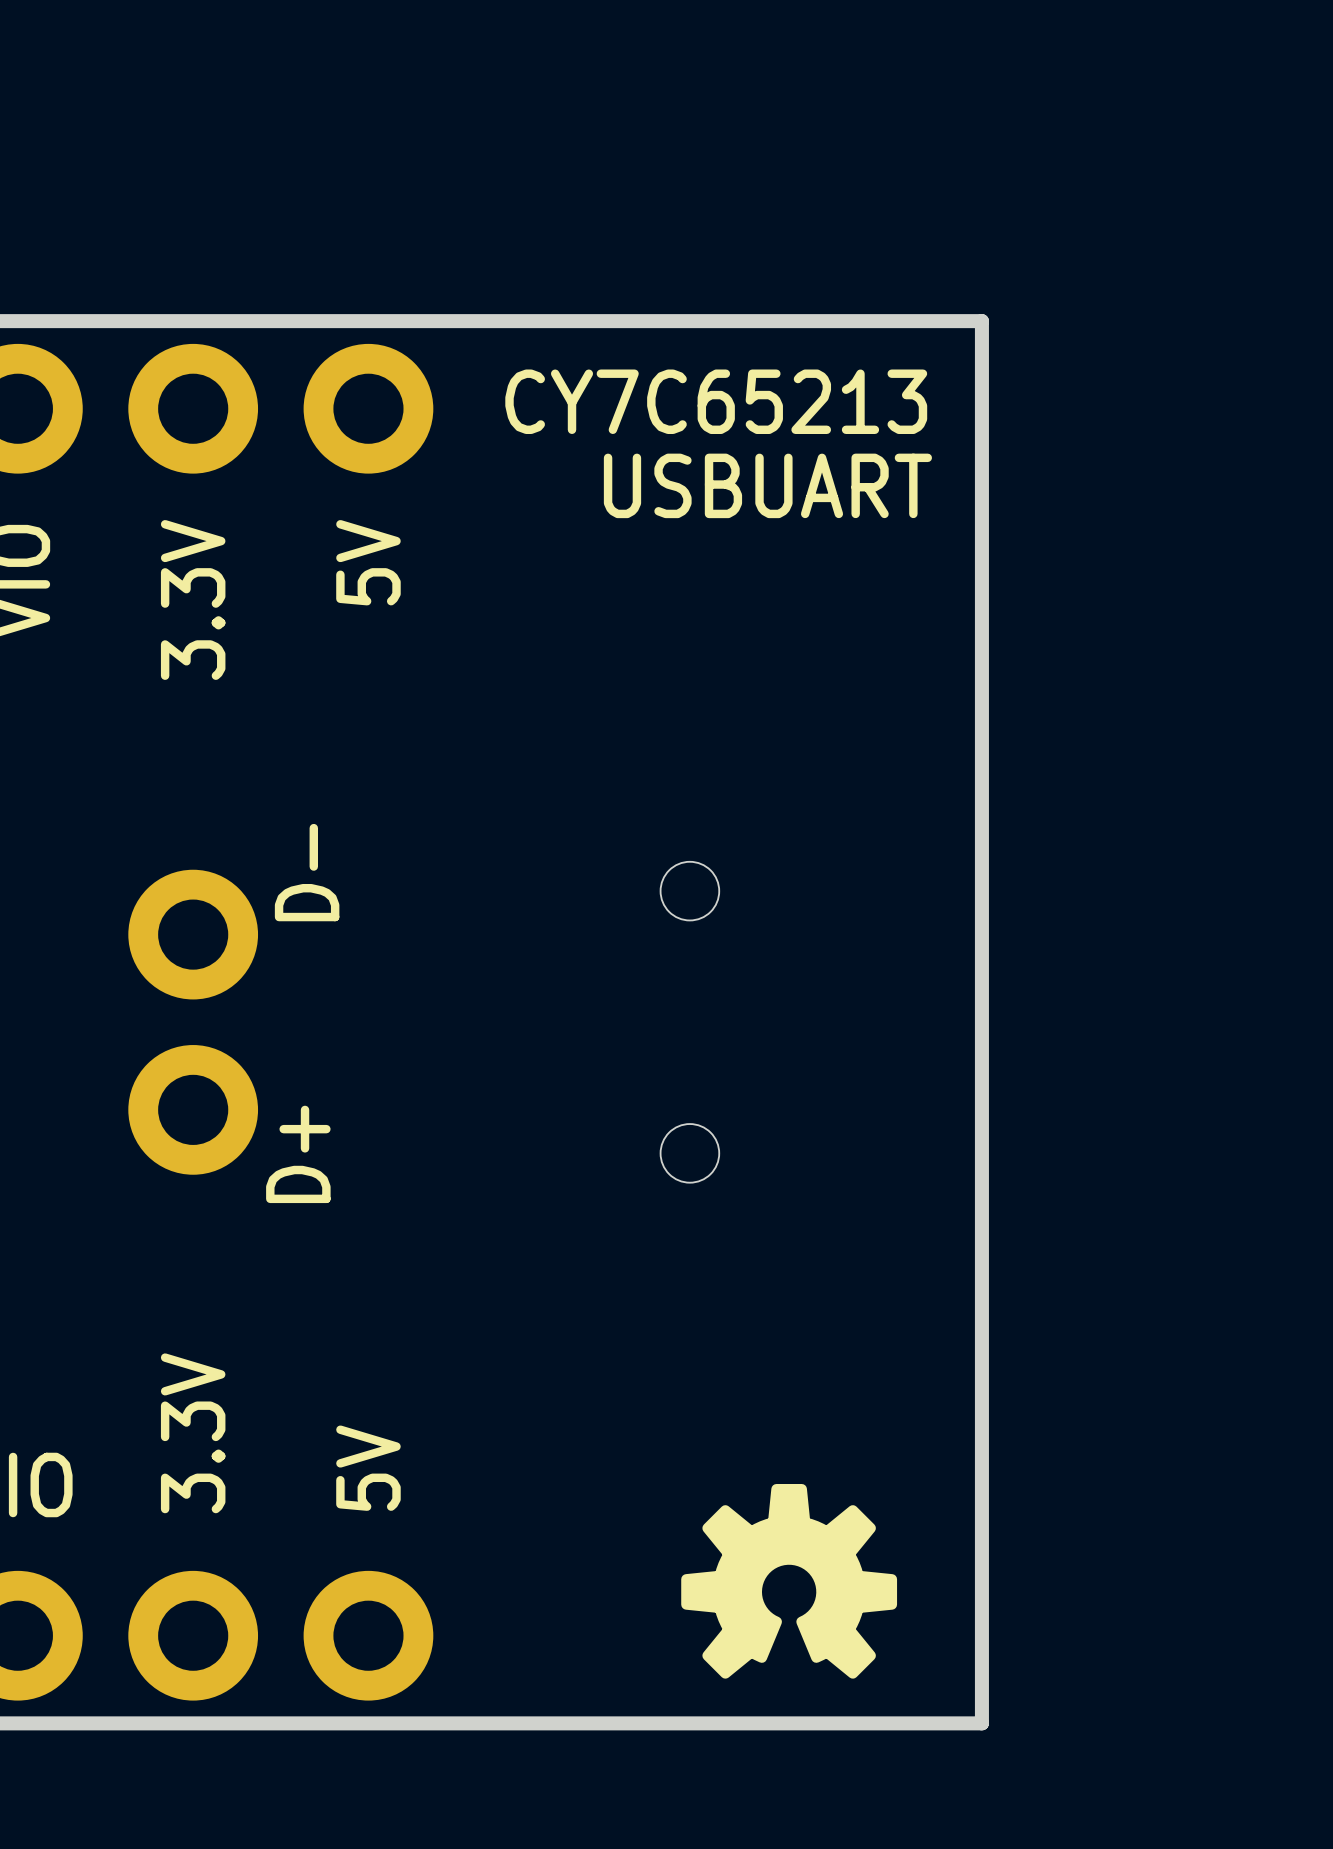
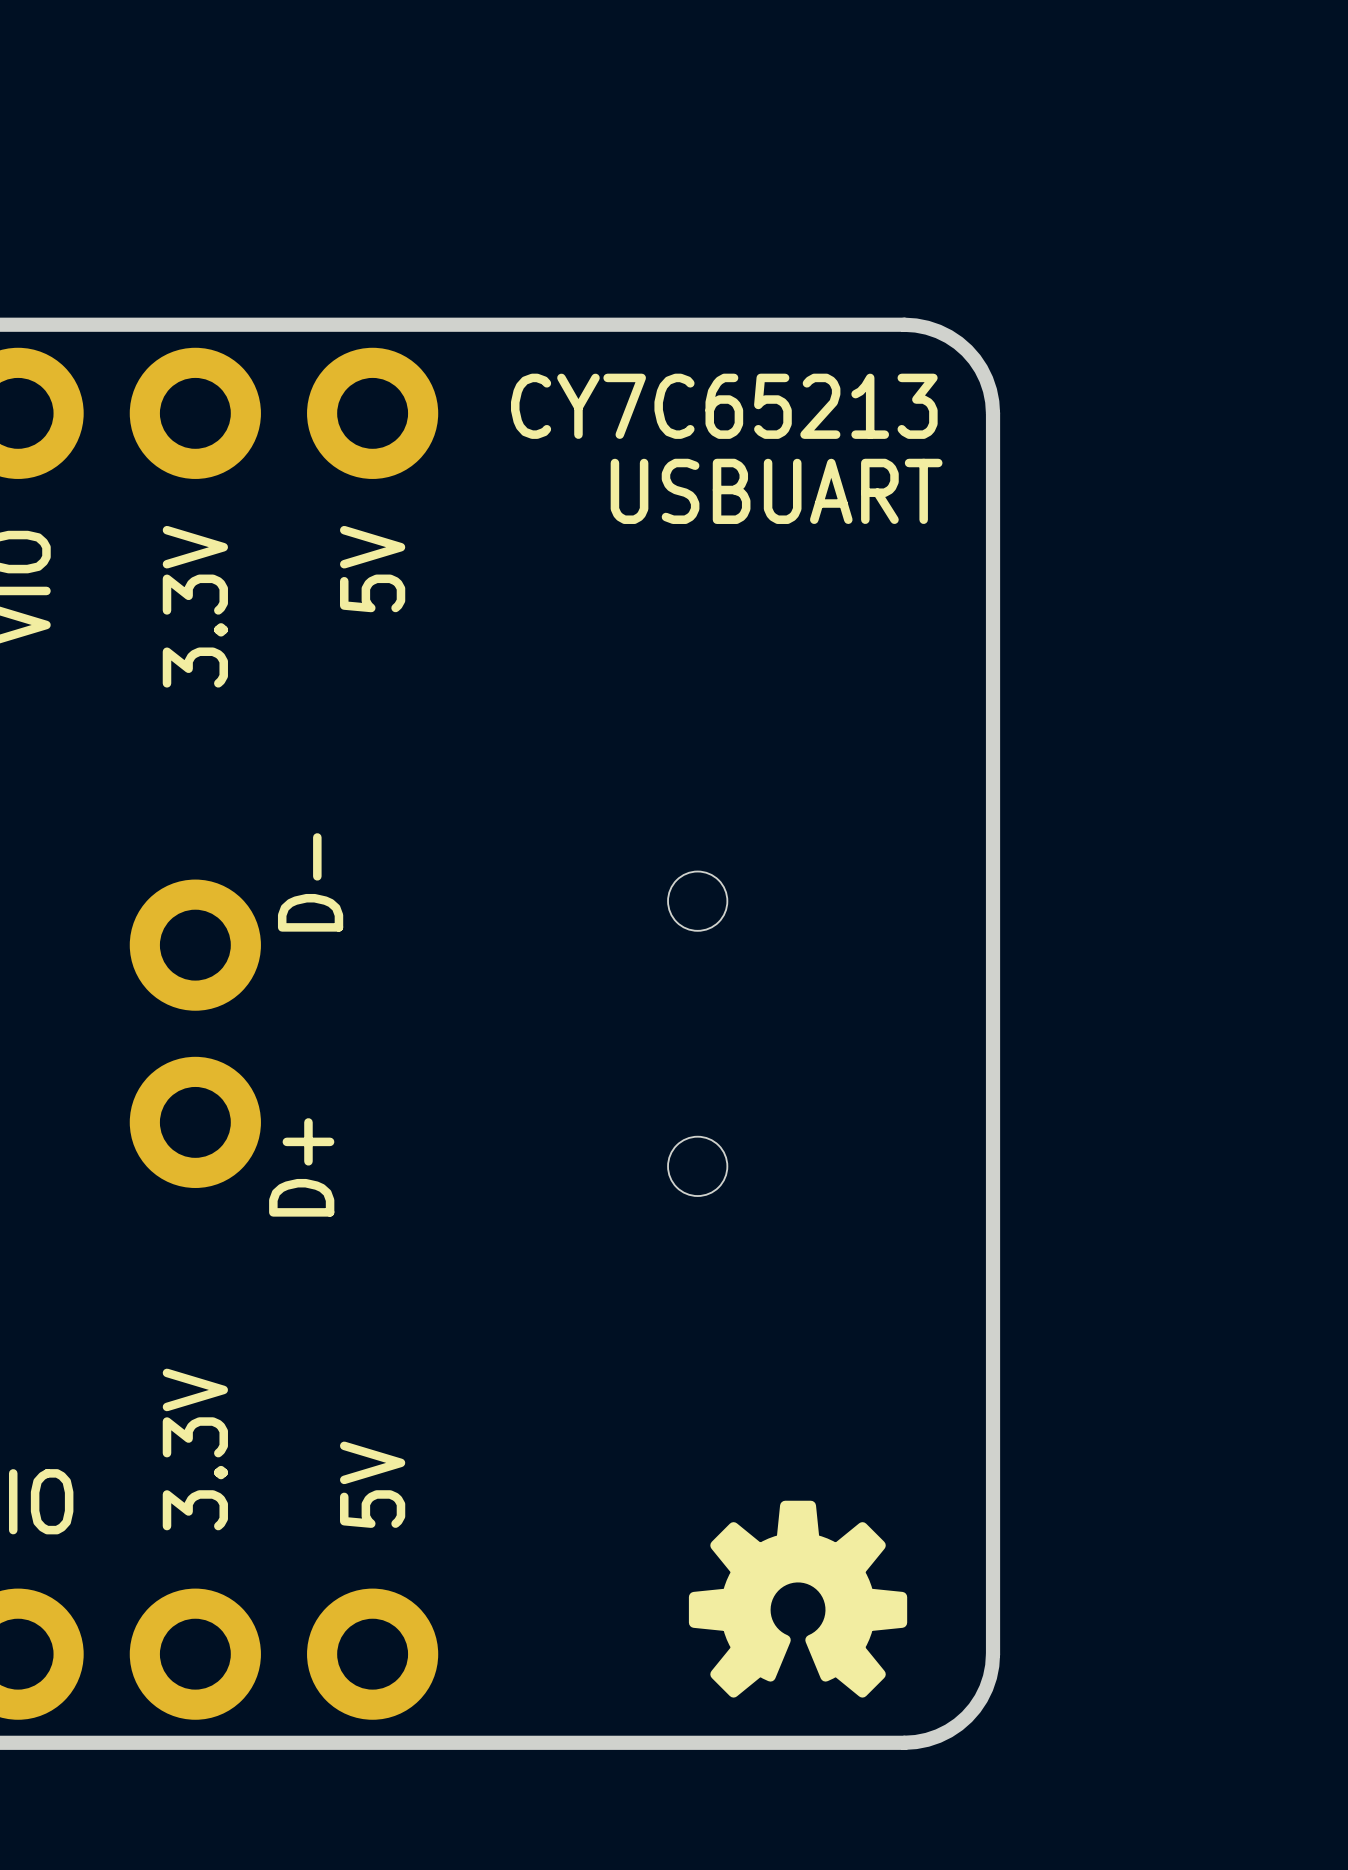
board edge: (894, 321) (981, 321) (981, 408) -> (904, 324) (927, 327) (938, 331) (948, 336) (967, 350) (981, 369) (986, 379) (990, 390) (993, 413)
board edge: (981, 1635) (981, 1723) (894, 1723) -> (993, 1654) (990, 1677) (986, 1688) (981, 1698) (967, 1716) (948, 1730) (938, 1736) (927, 1739) (904, 1742)

